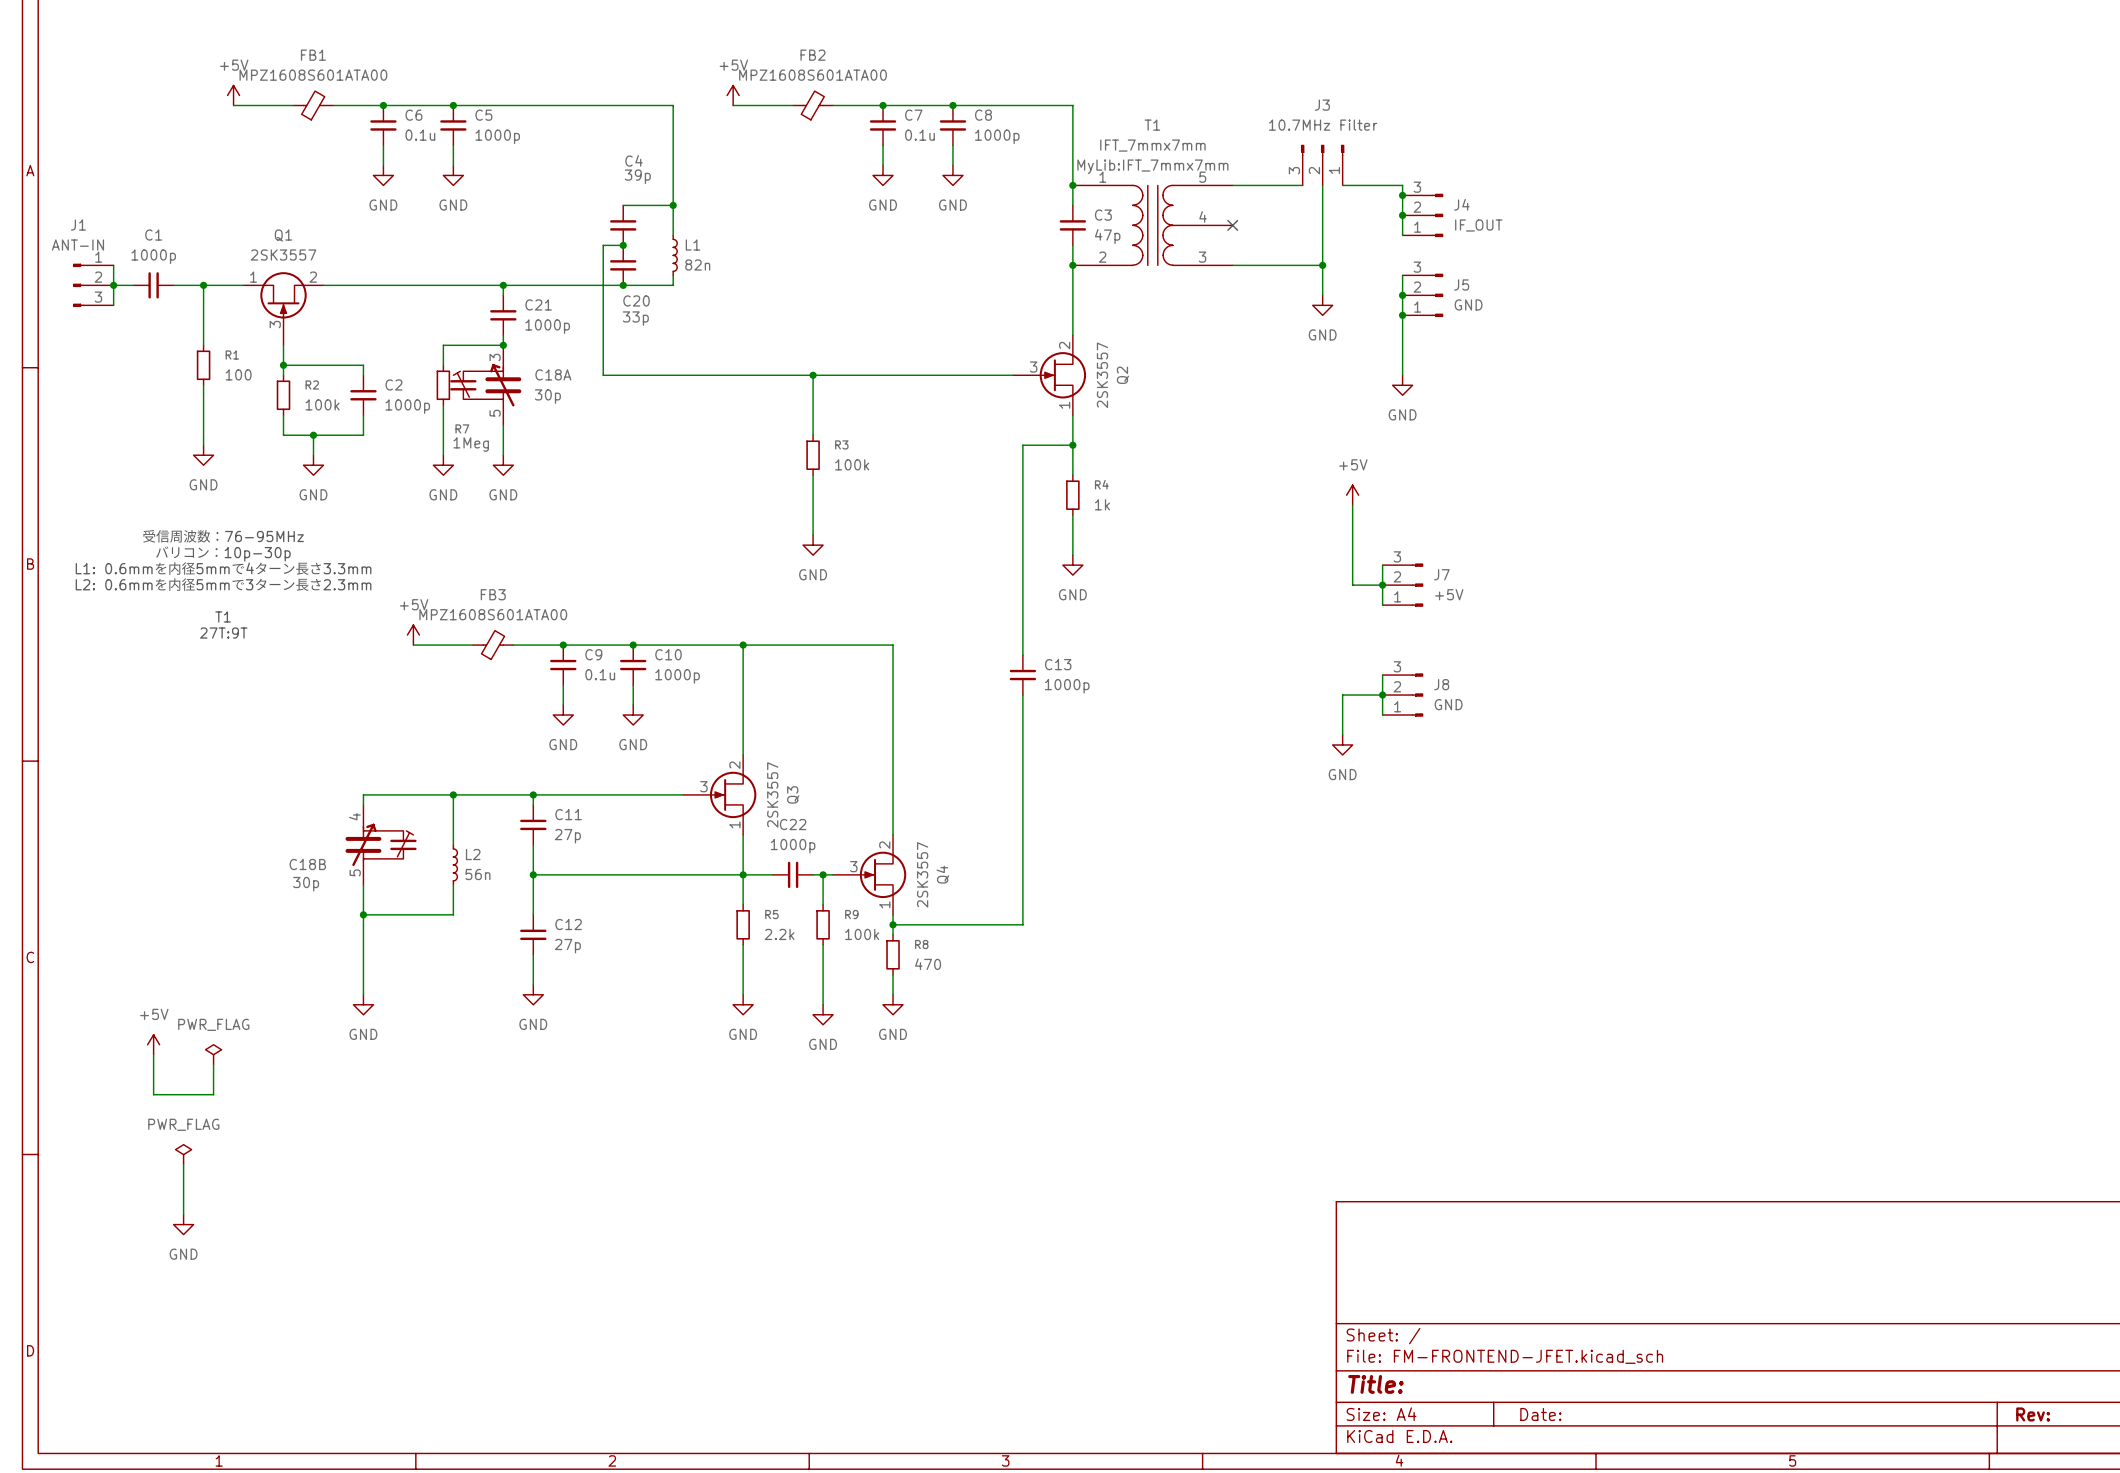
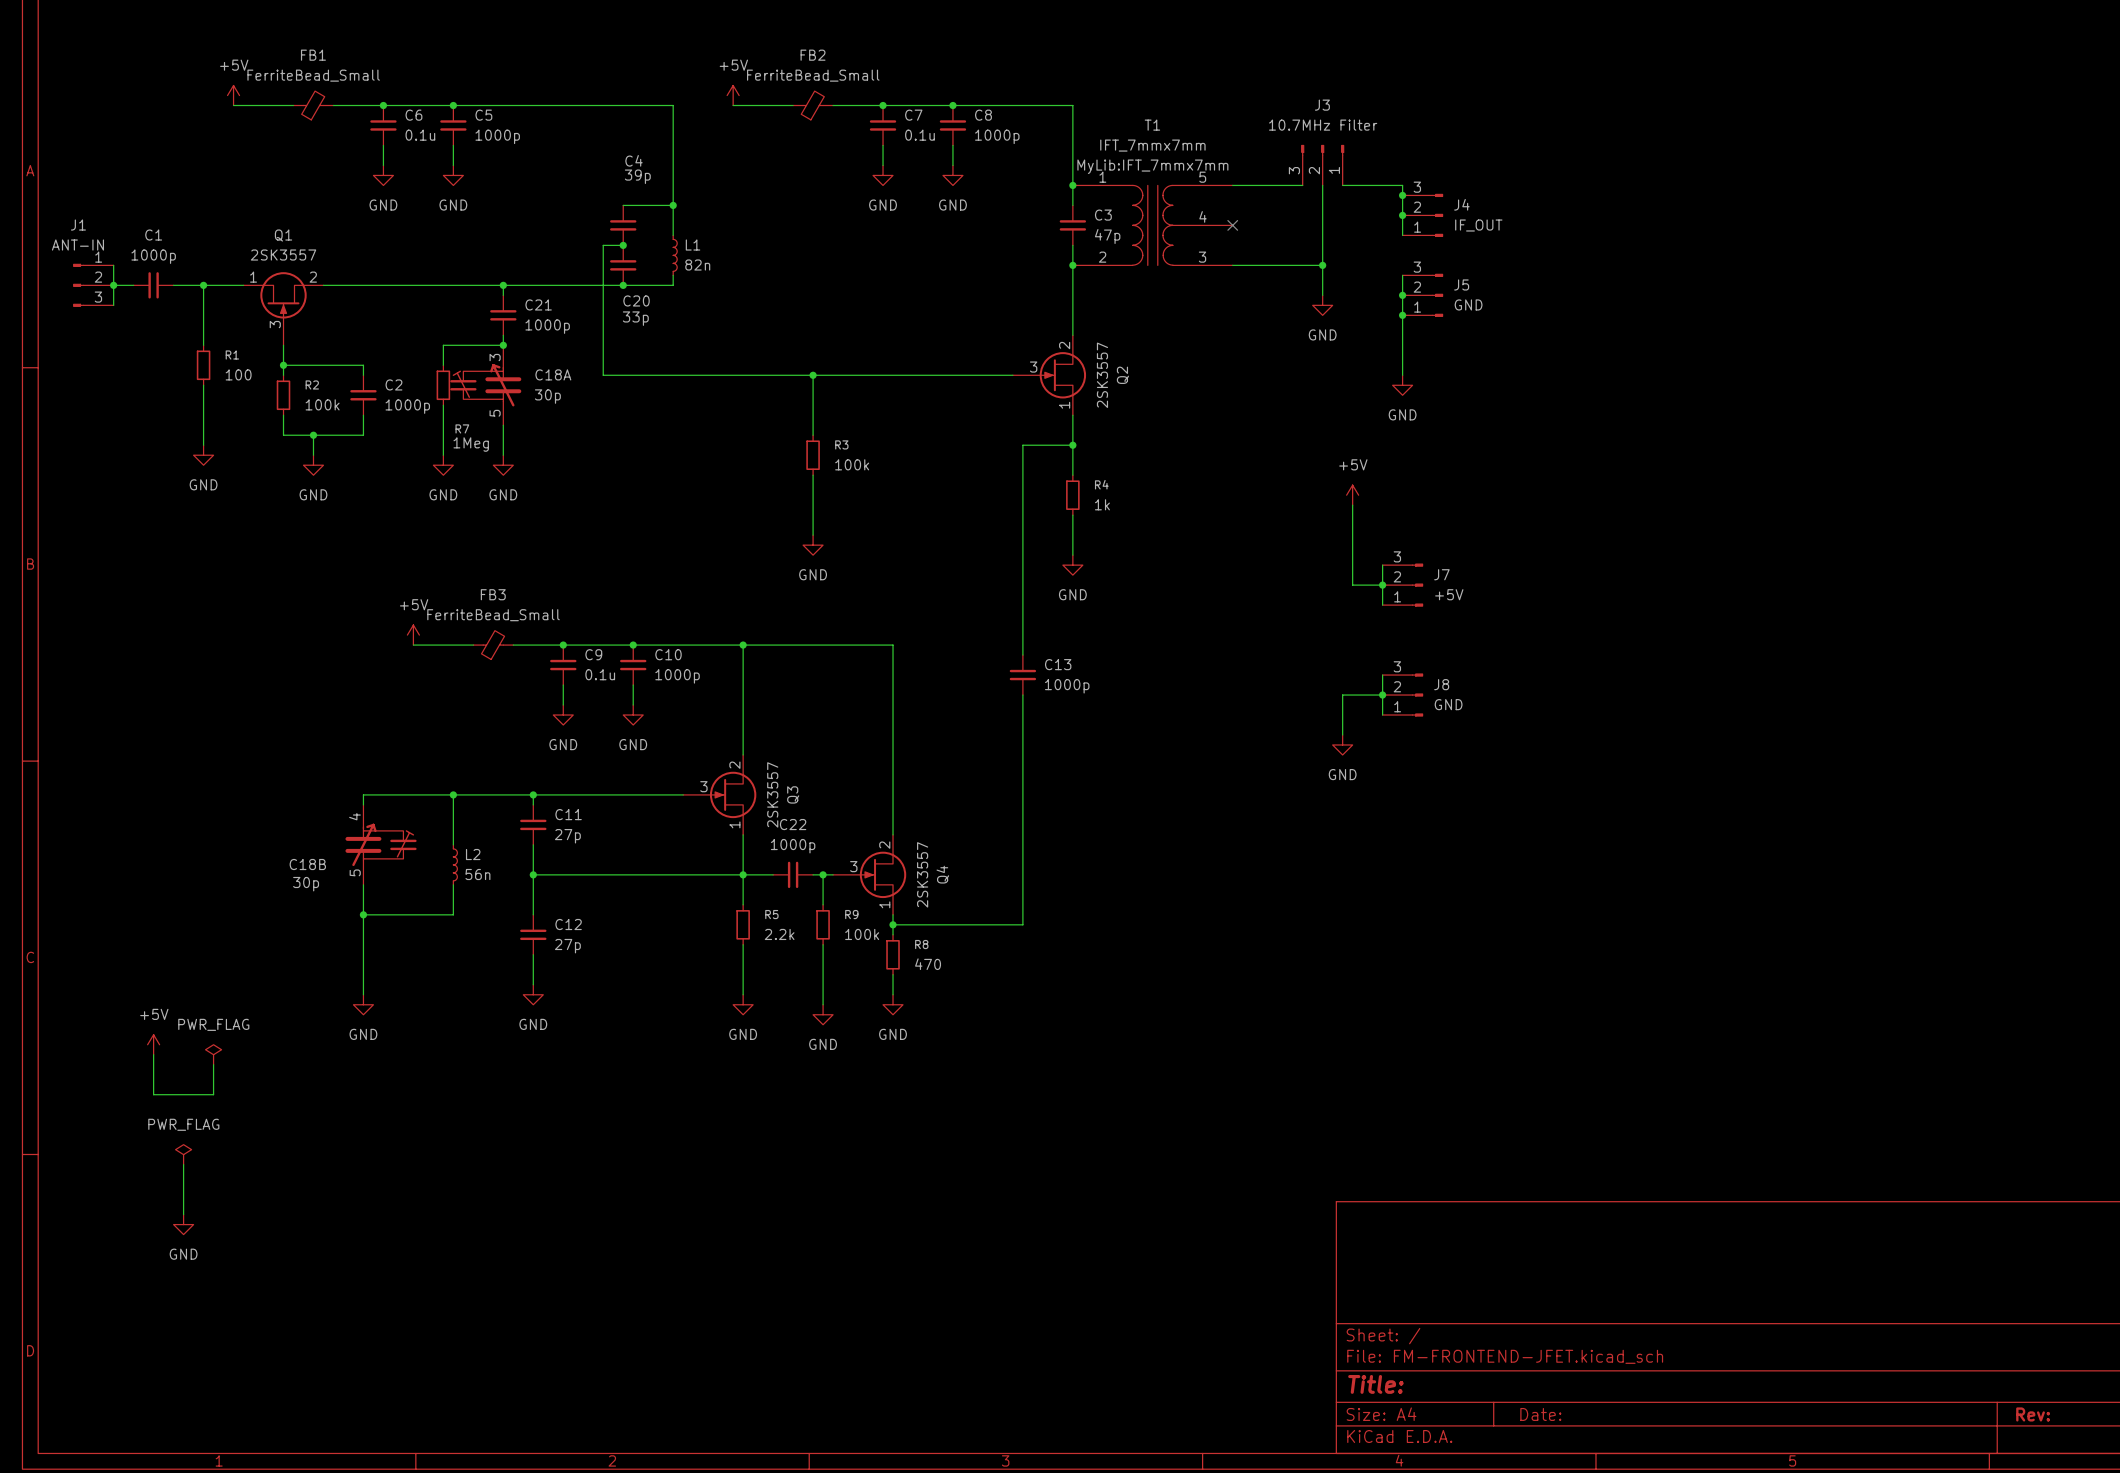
FB1 value: MPZ1608S601ATA00 (313, 75) -> FerriteBead_Small (313, 75)
FB2 value: MPZ1608S601ATA00 (813, 75) -> FerriteBead_Small (813, 75)
text: 受信周波数：76-95MHz (223, 536) -> none
text: バリコン：10p-30p (223, 553) -> none
text: L1: 0.6mmを内径5mmで4ターン長さ3.3mm (223, 568) -> none
text: L2: 0.6mmを内径5mmで3ターン長さ2.3mm (223, 584) -> none
FB3 value: MPZ1608S601ATA00 (493, 614) -> FerriteBead_Small (493, 615)
text: T1 (223, 616) -> none
text: 27T:9T (223, 633) -> none

